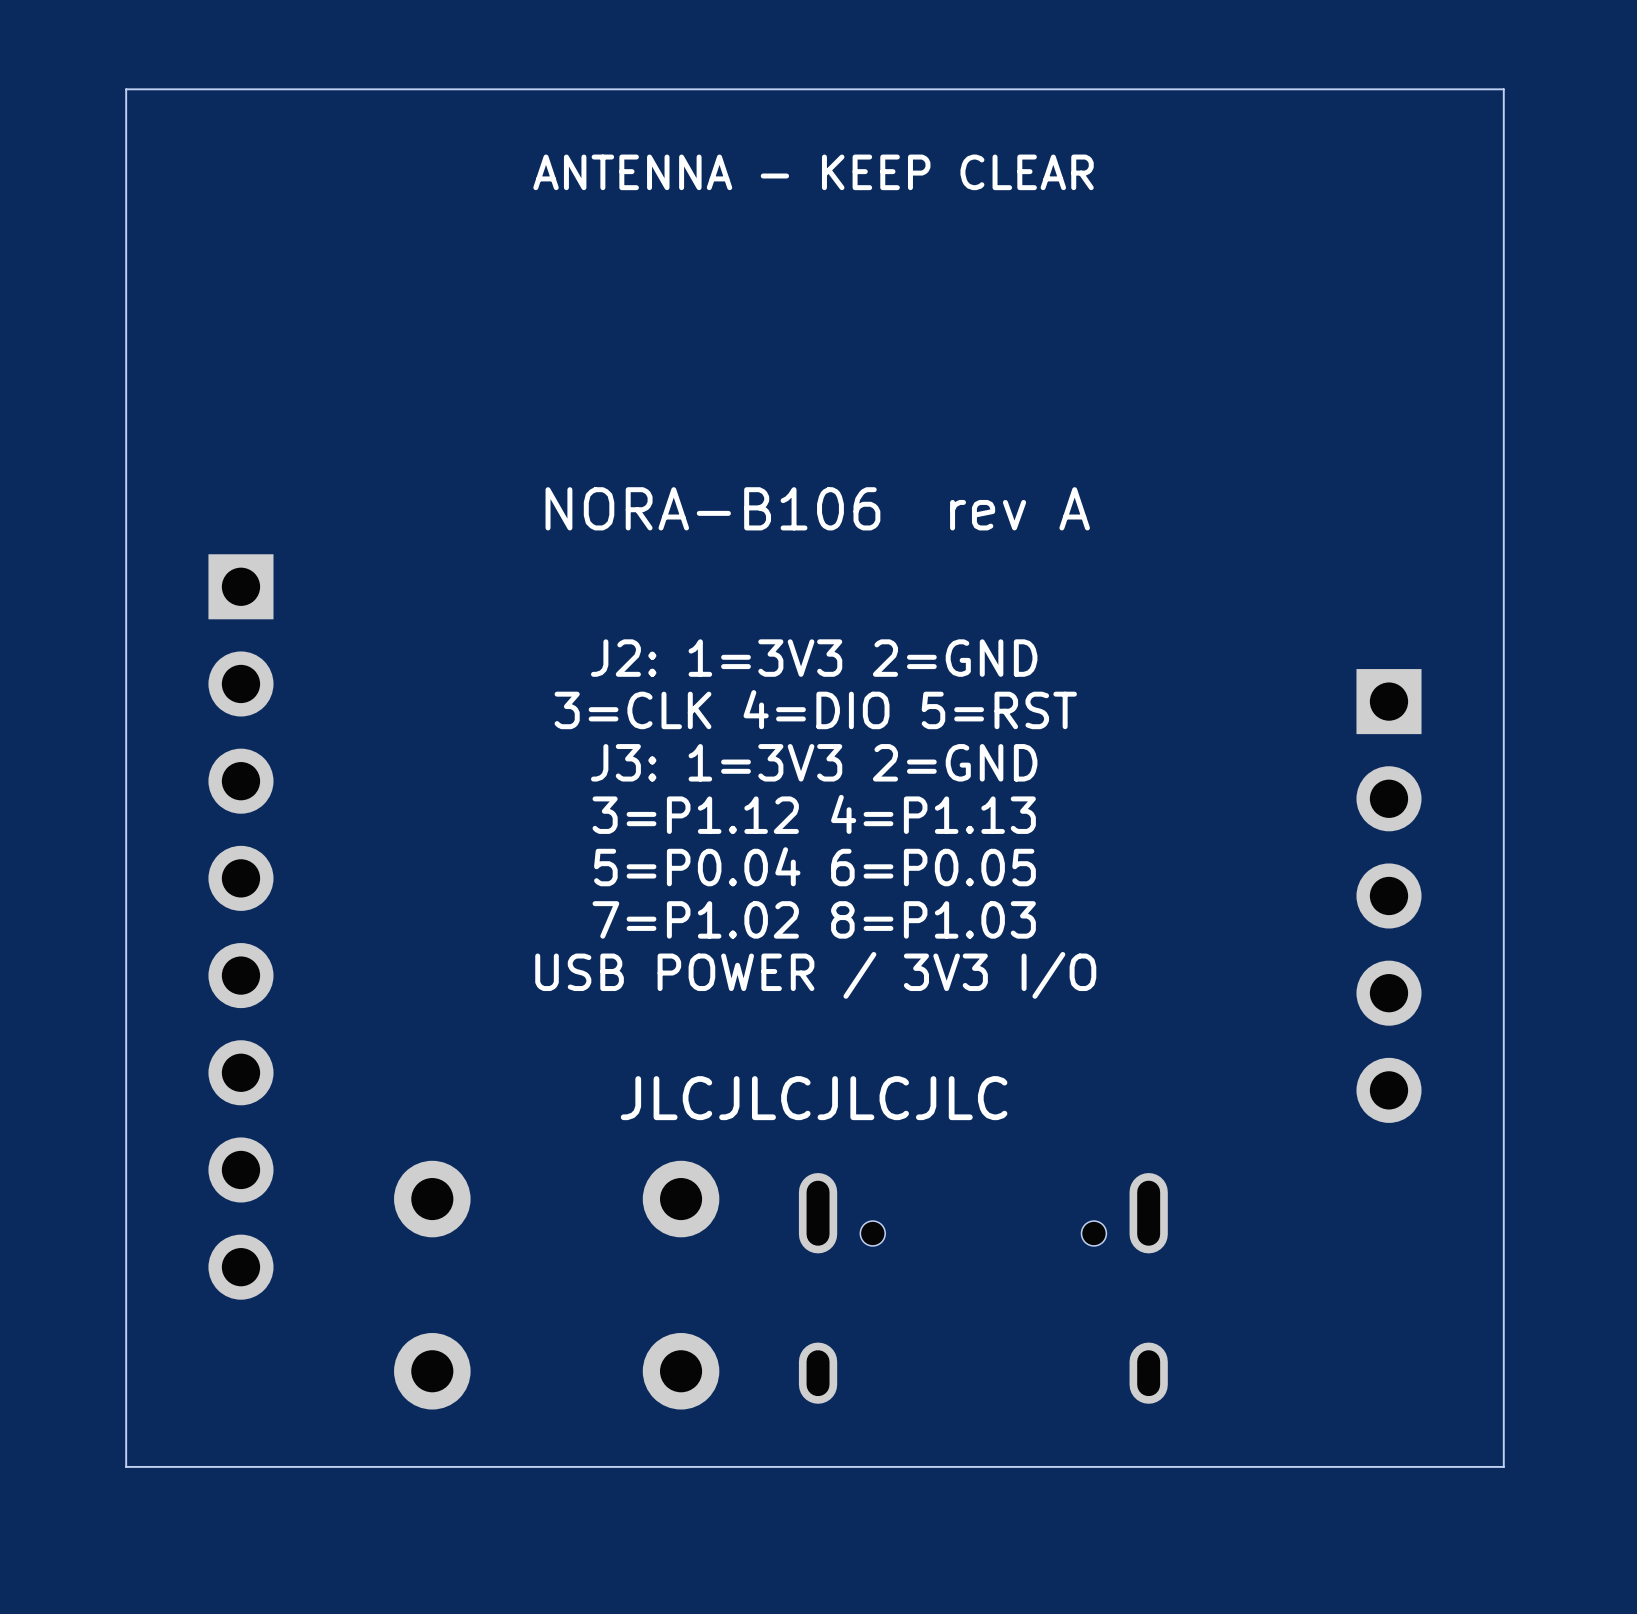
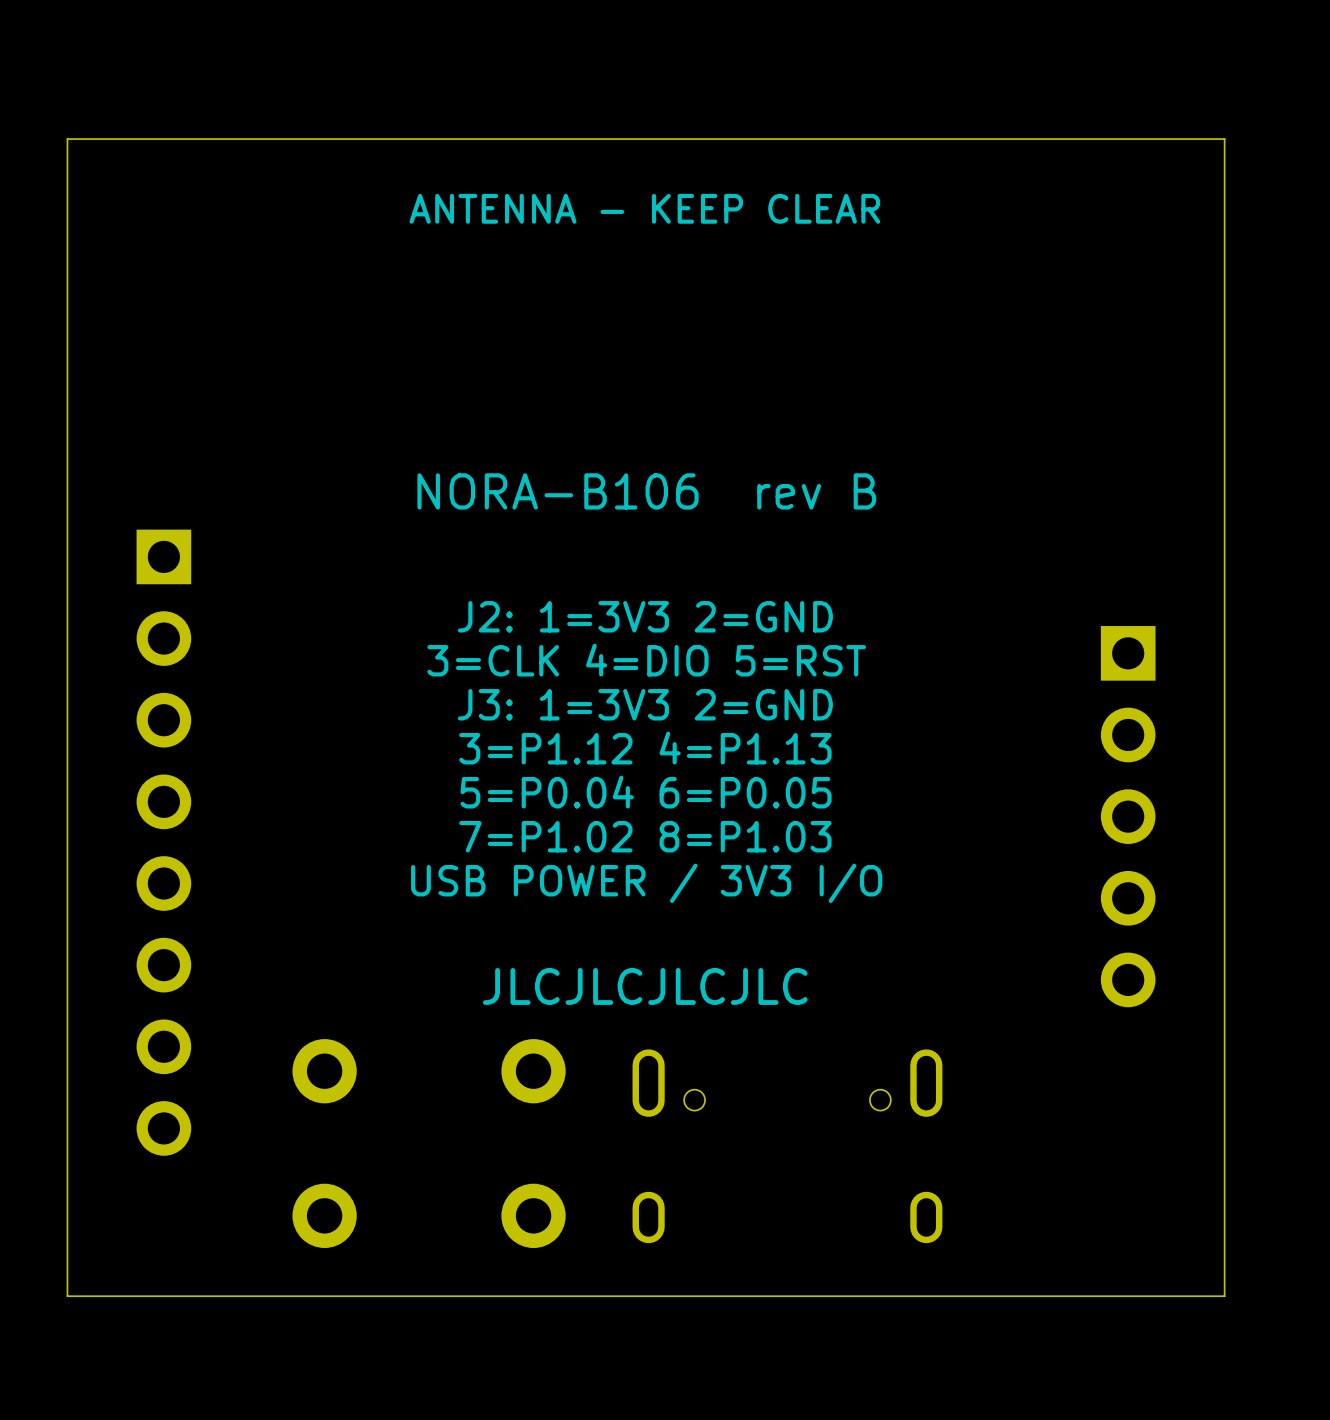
text: NORA-B106 rev A (817, 508) -> NORA-B106 rev B (646, 491)

